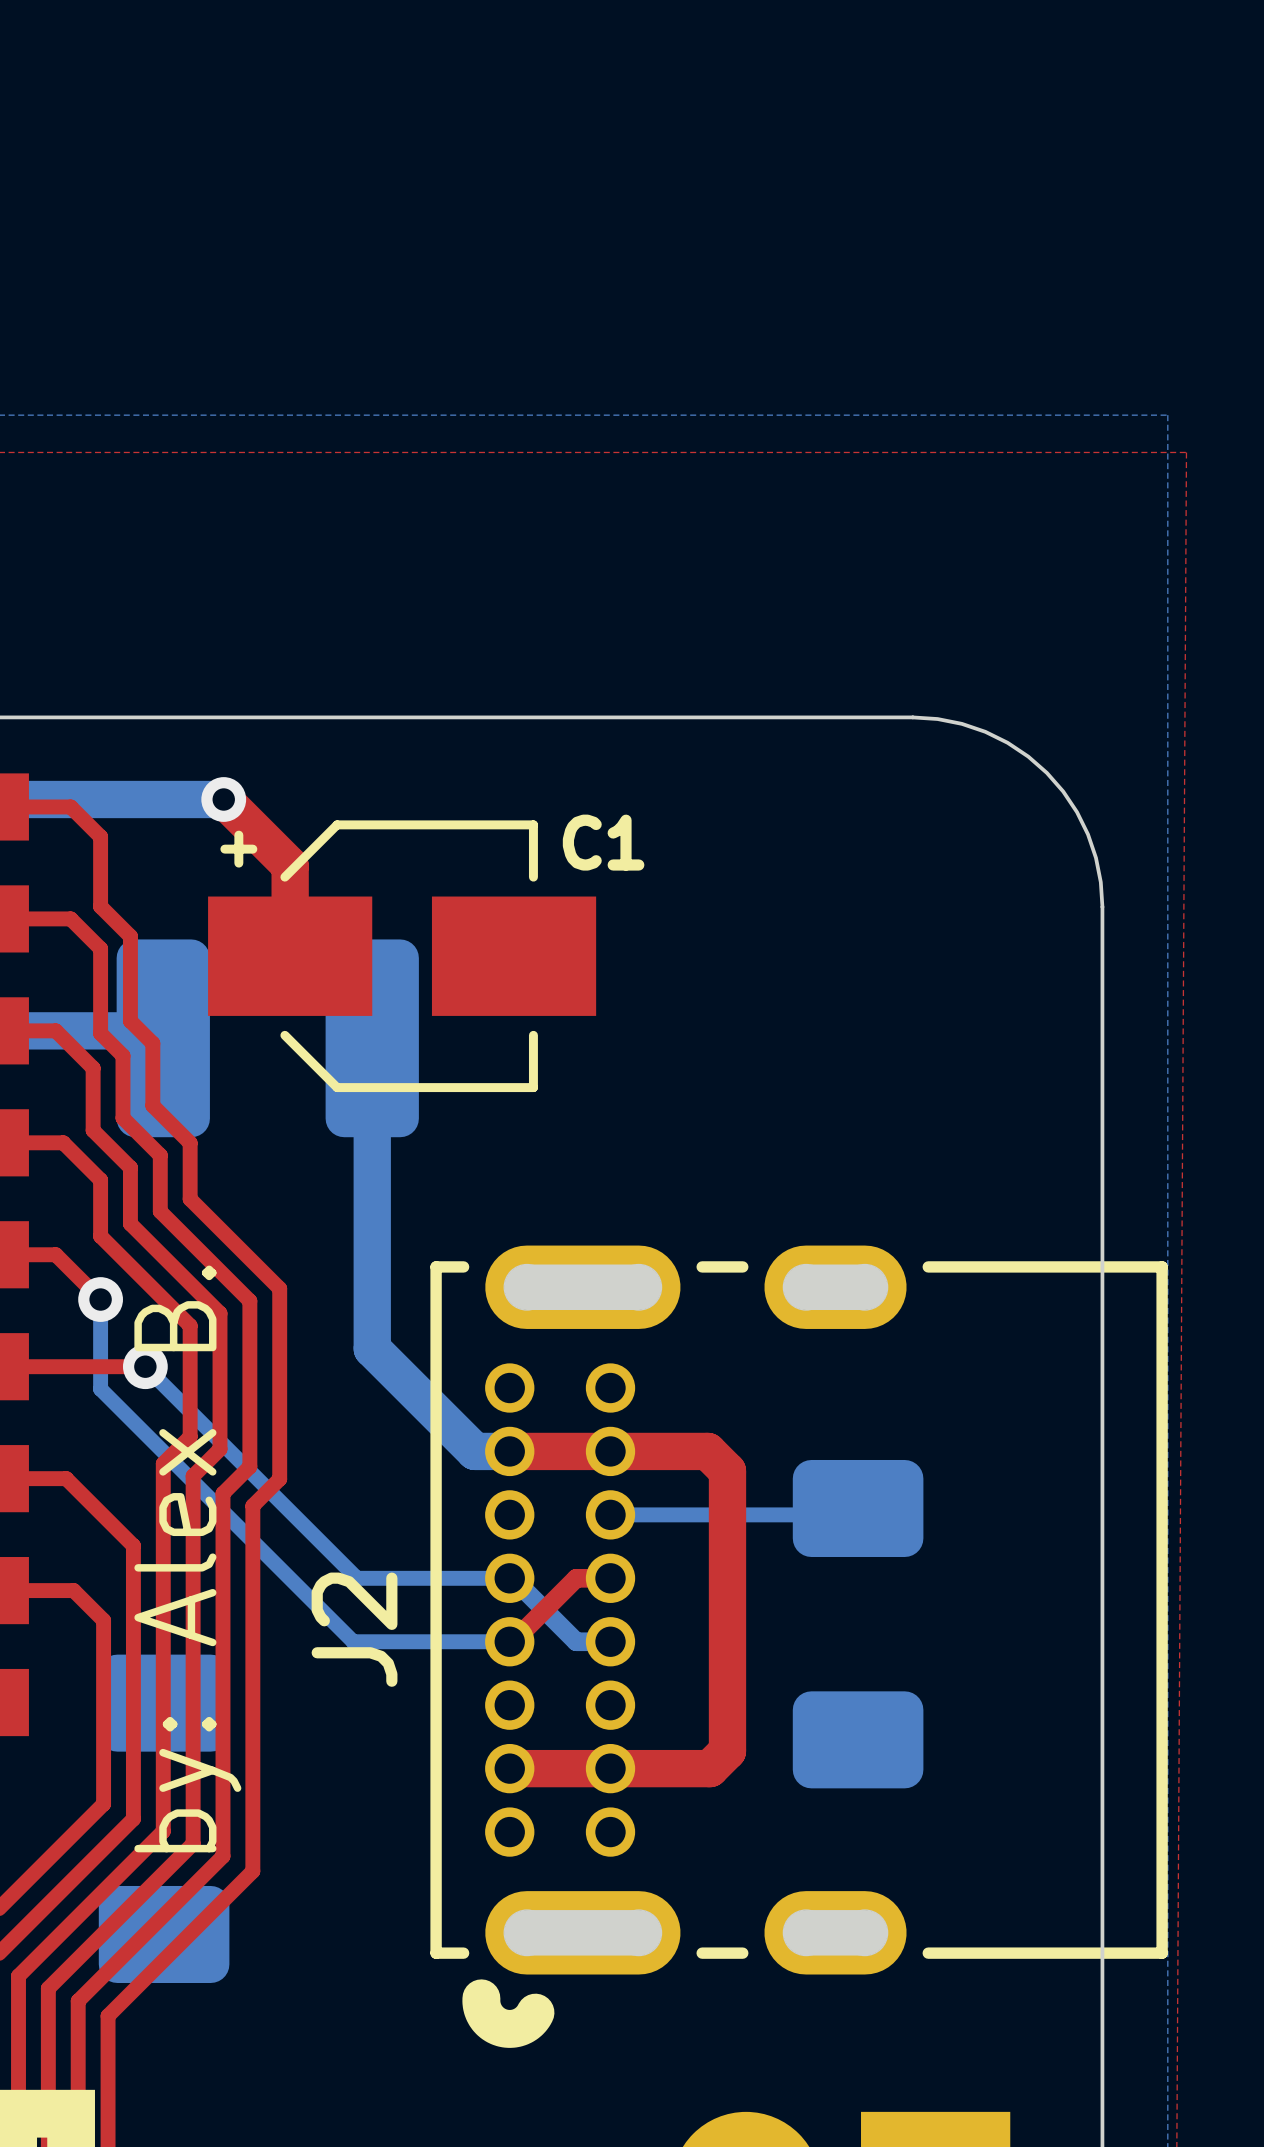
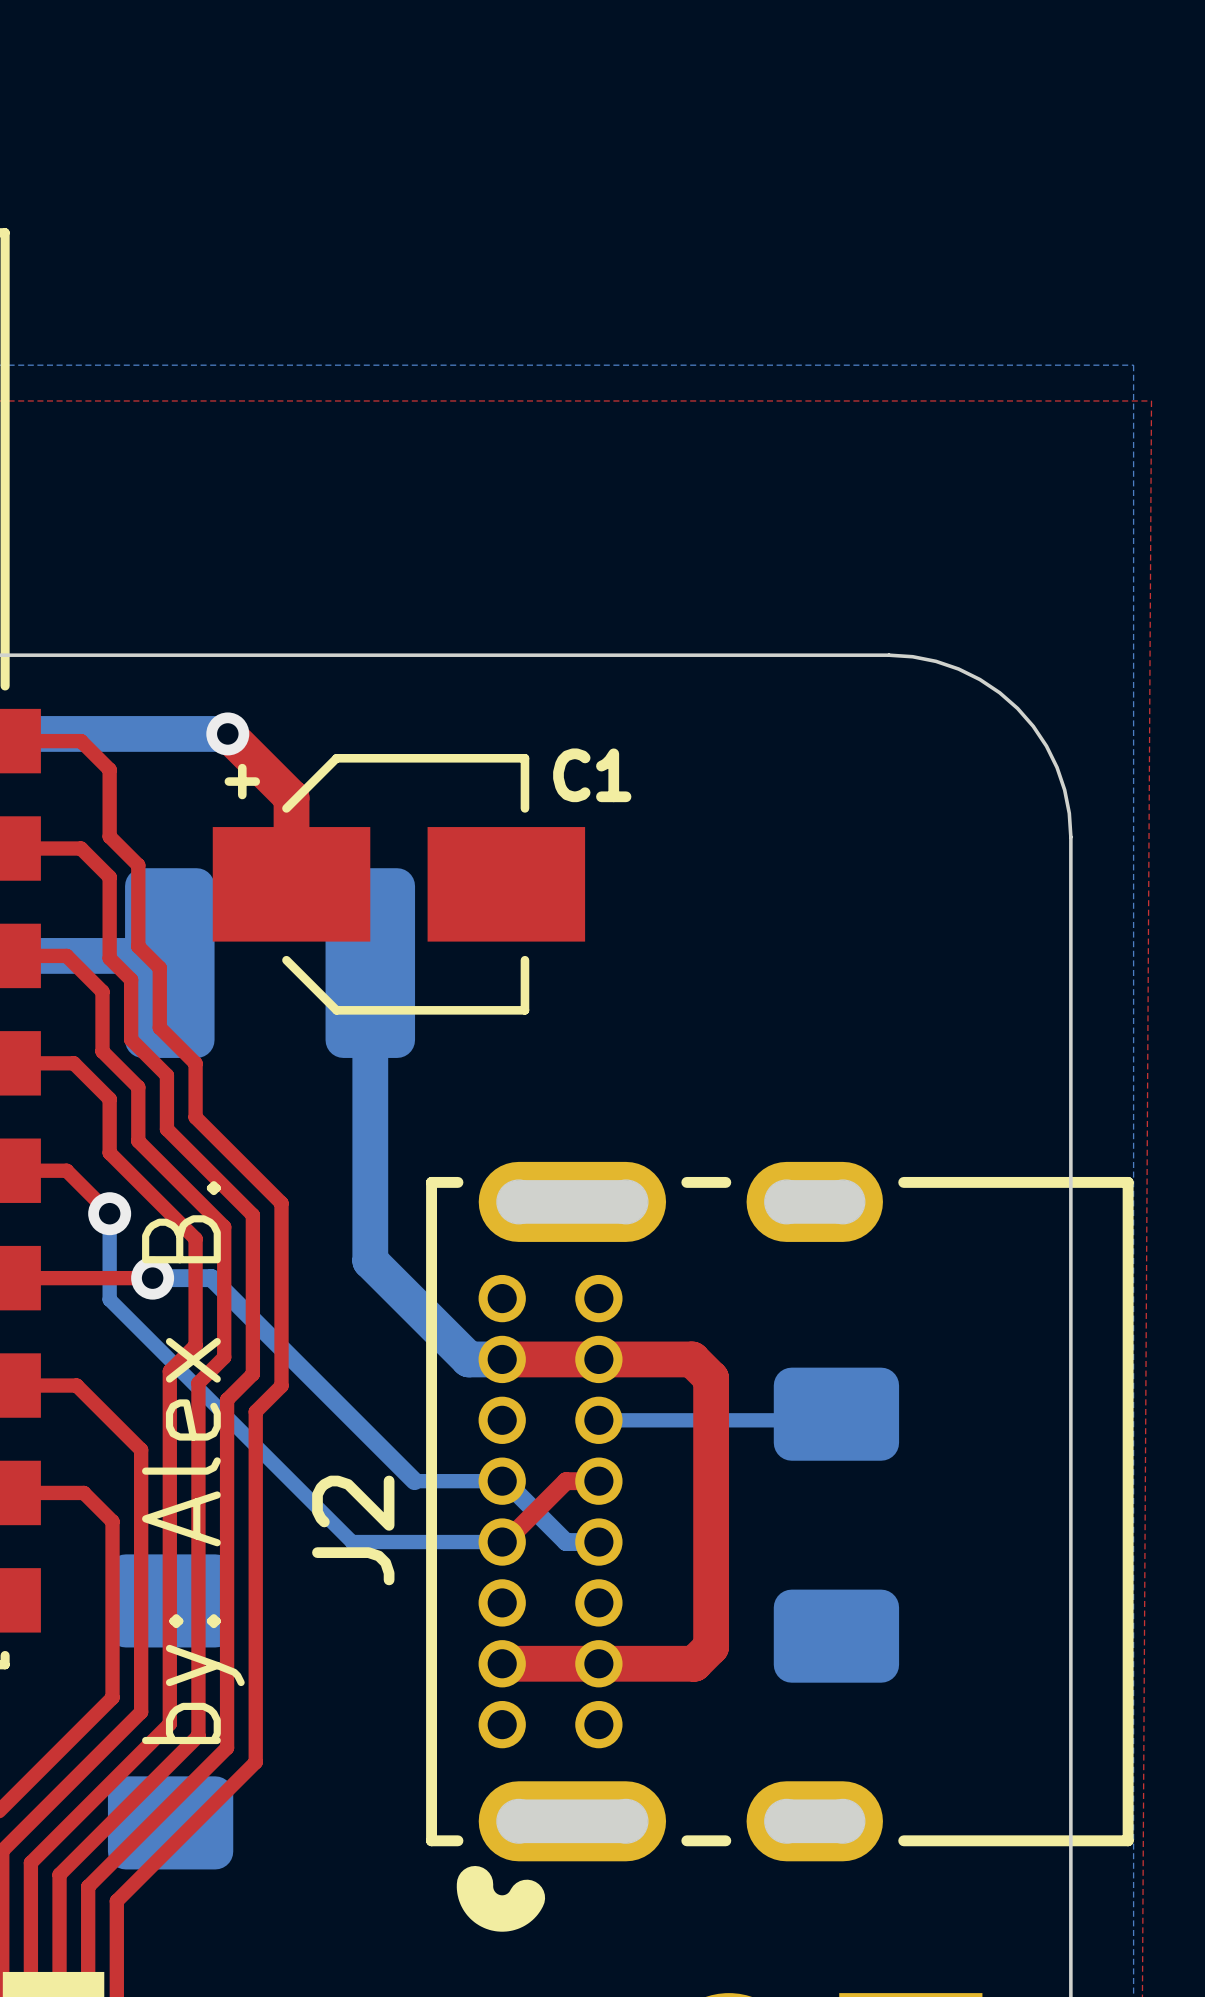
bottom track: (145, 1366) (356, 1578) (418, 1578) -> (152, 1278) (211, 1278) (414, 1481)

